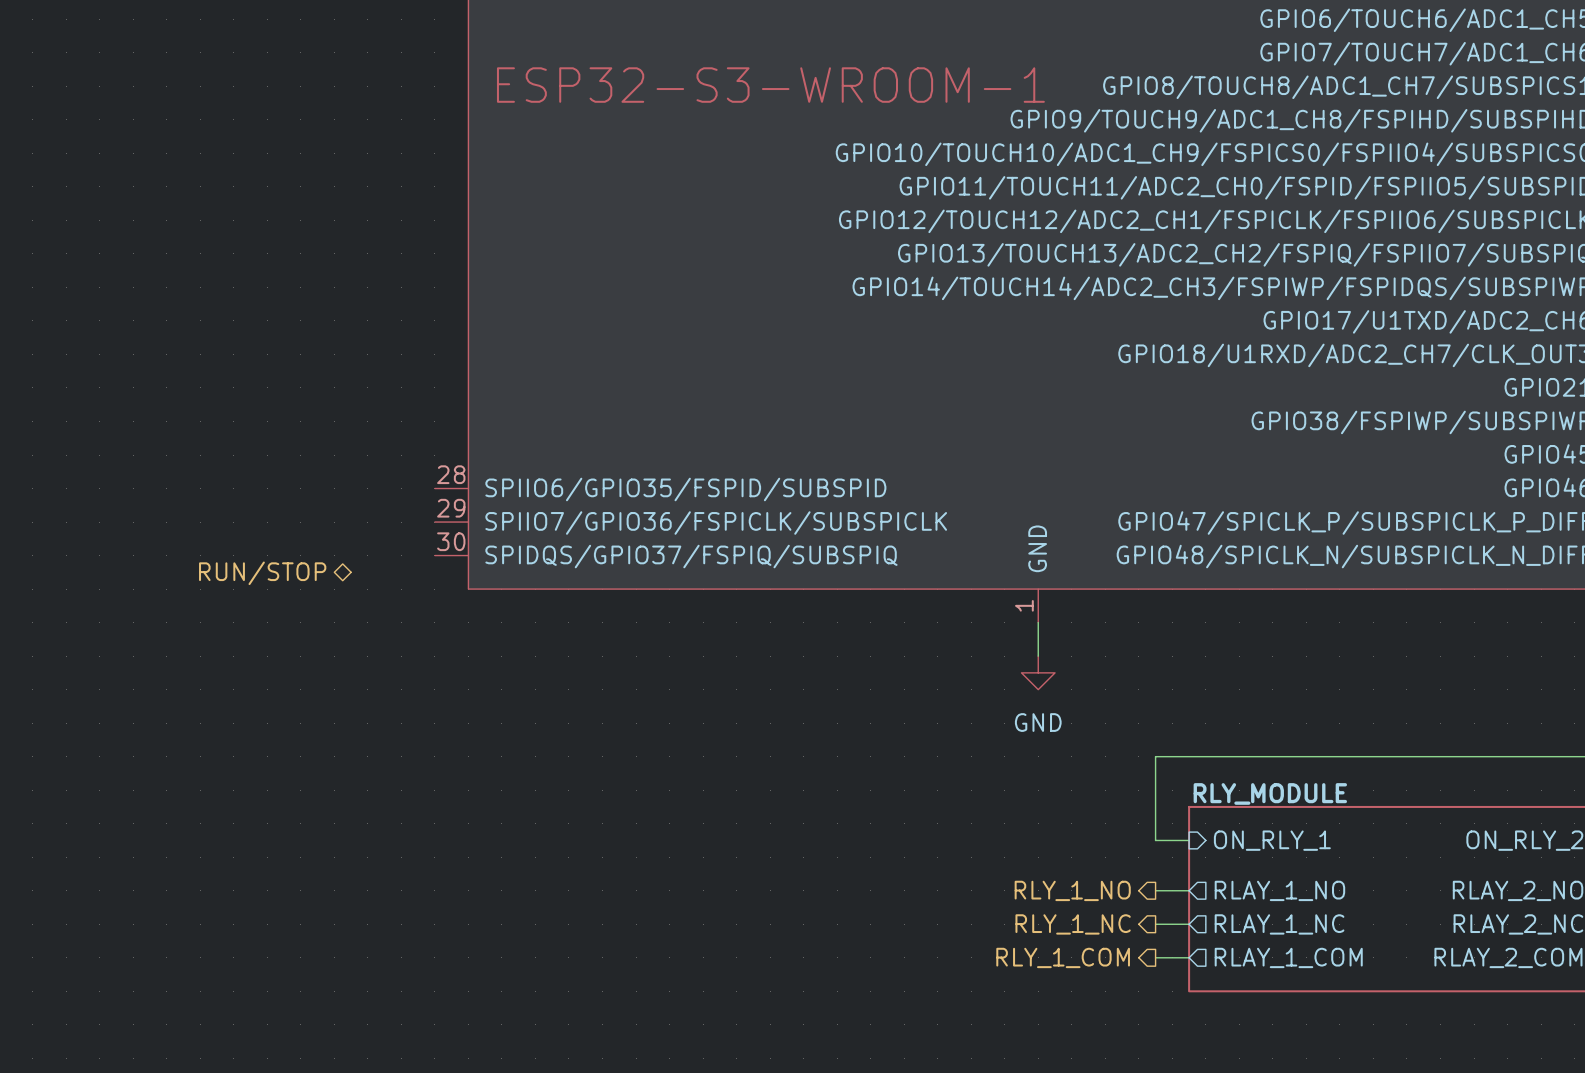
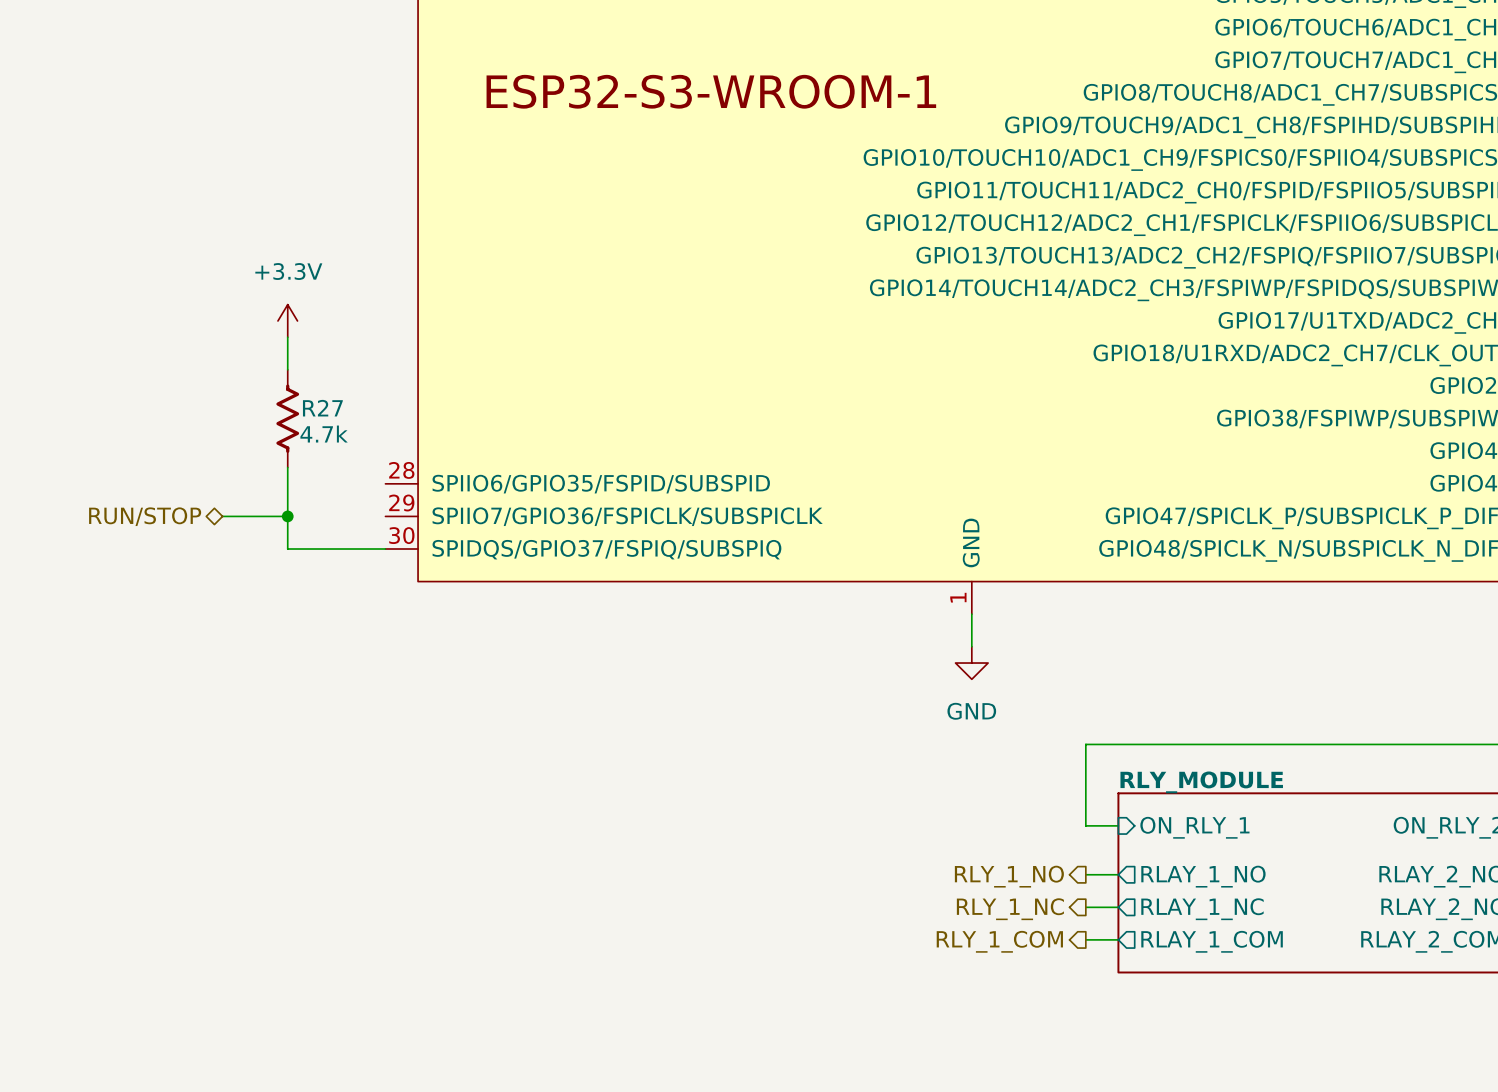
power symbol: none -> +3.3V (287, 320)
wire: none -> (287, 337) (287, 369)
R27: none -> (287, 418)
wire: none -> (287, 467) (287, 549) (385, 549)
wire: none -> (222, 516) (287, 516)
junction: none -> (287, 516)
hierarchical label position: RUN/STOP (262, 573) -> RUN/STOP (145, 516)

